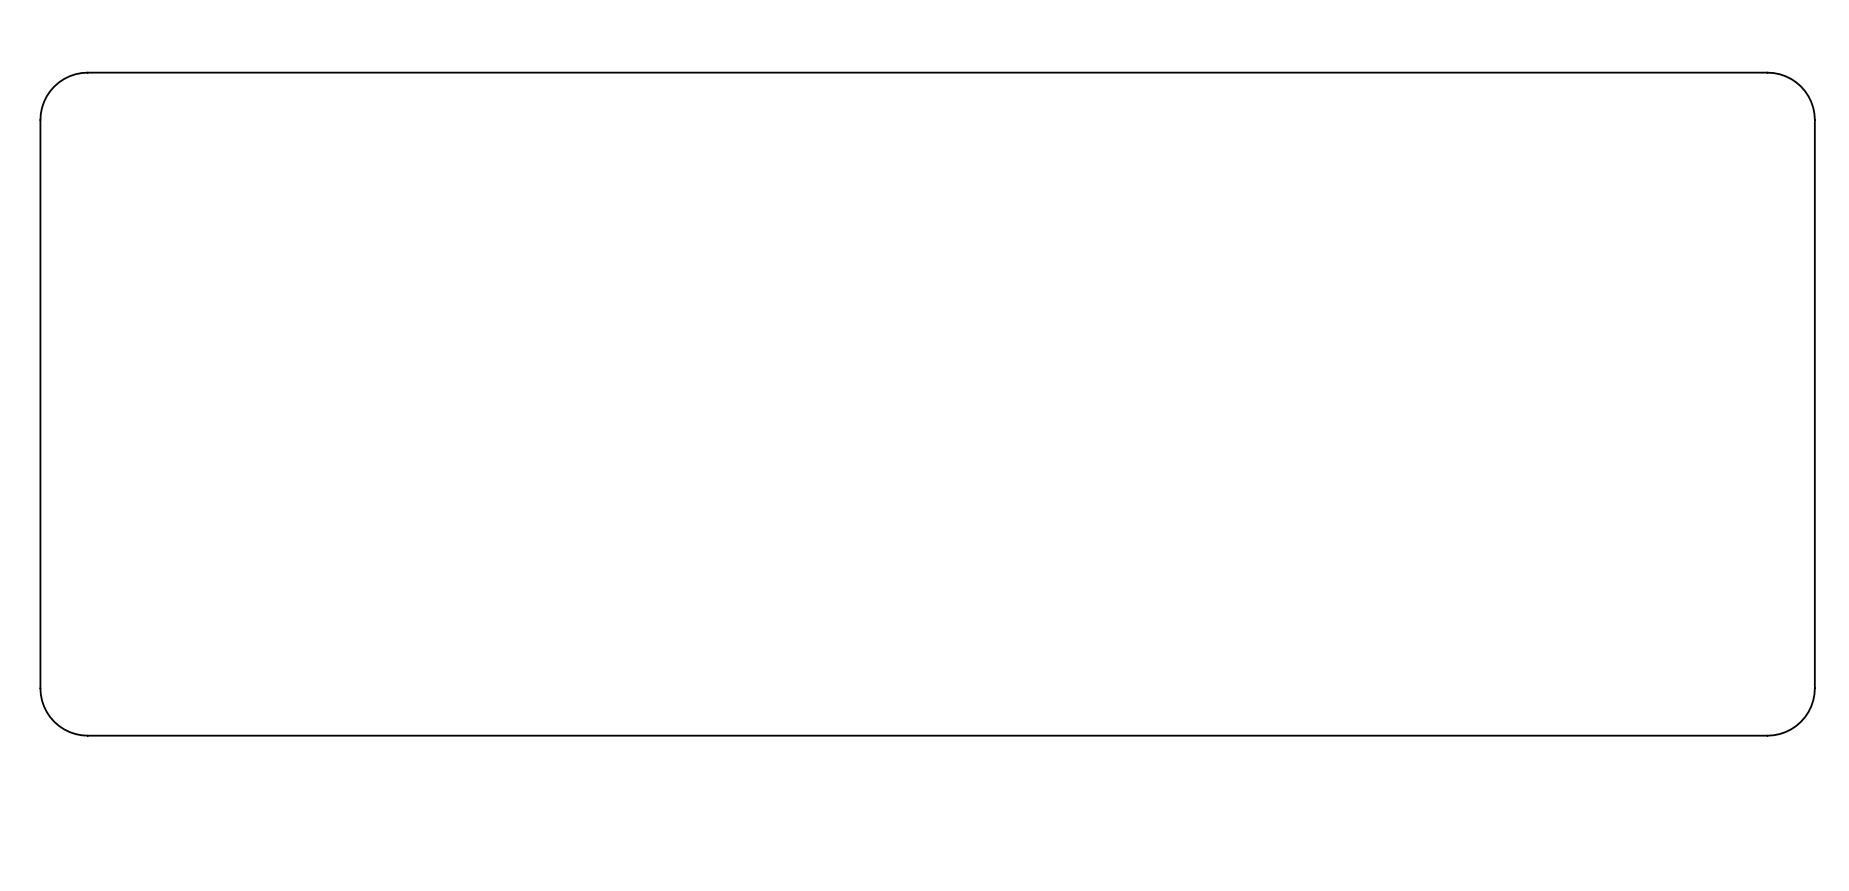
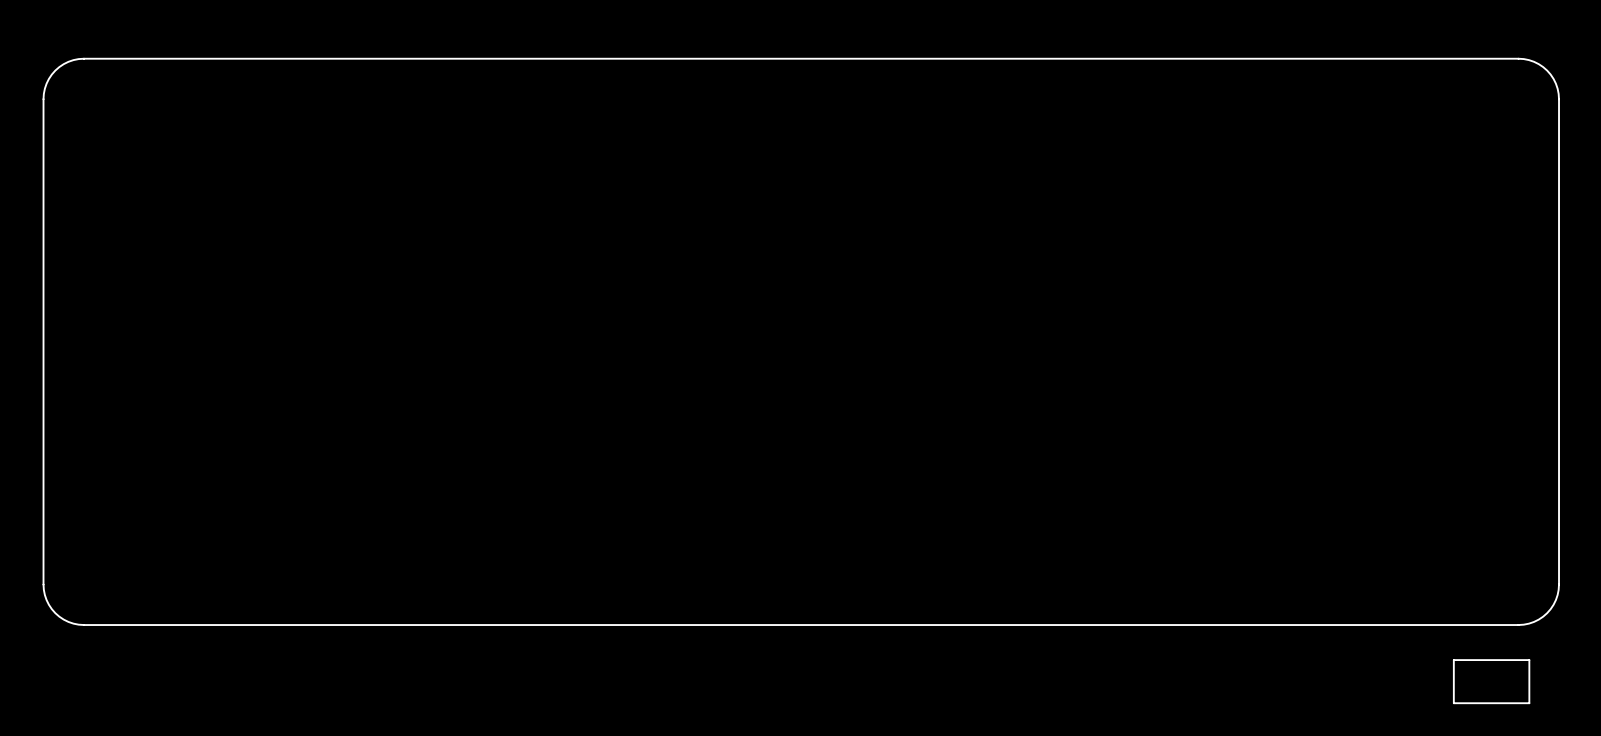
part: none -> (1491, 681)

